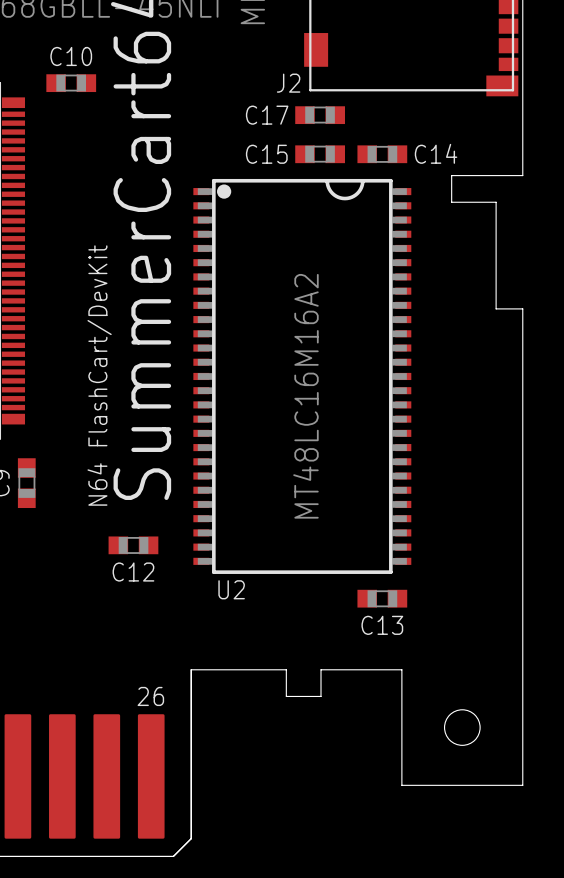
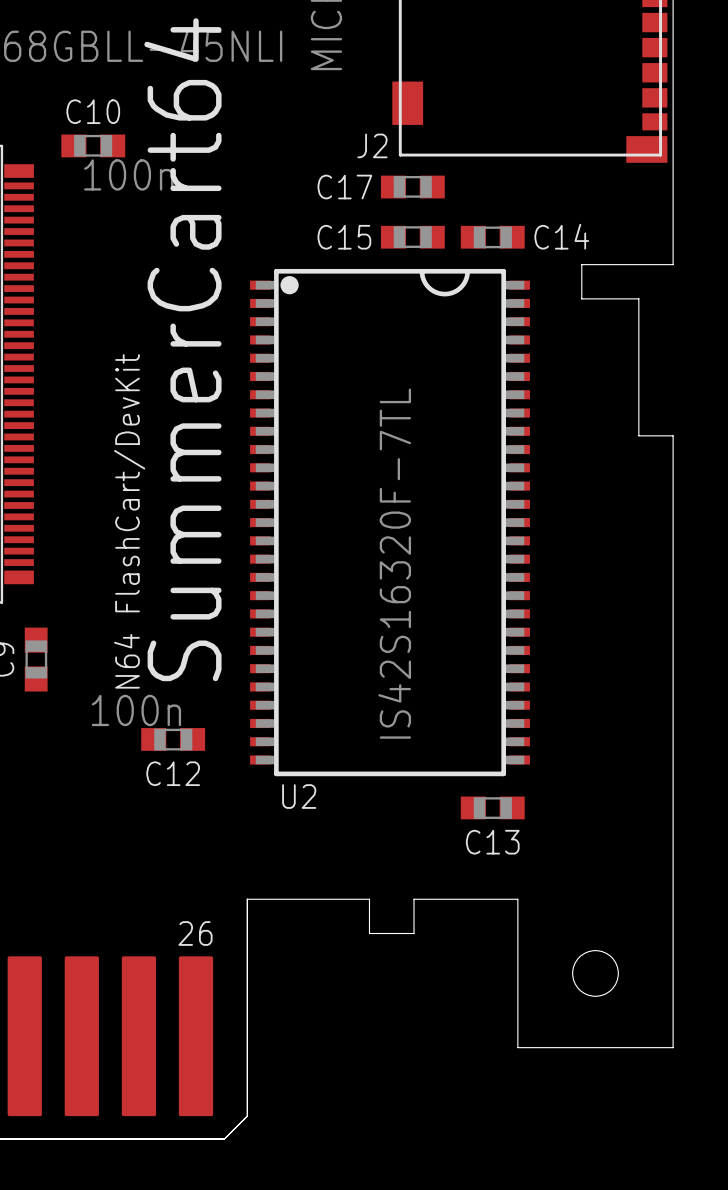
C10 value: none -> 100n (128, 174)
U2 value: MT48LC16M16A2 (305, 396) -> IS42S16320F-7TL (394, 563)
C12 value: none -> 100n (136, 710)

